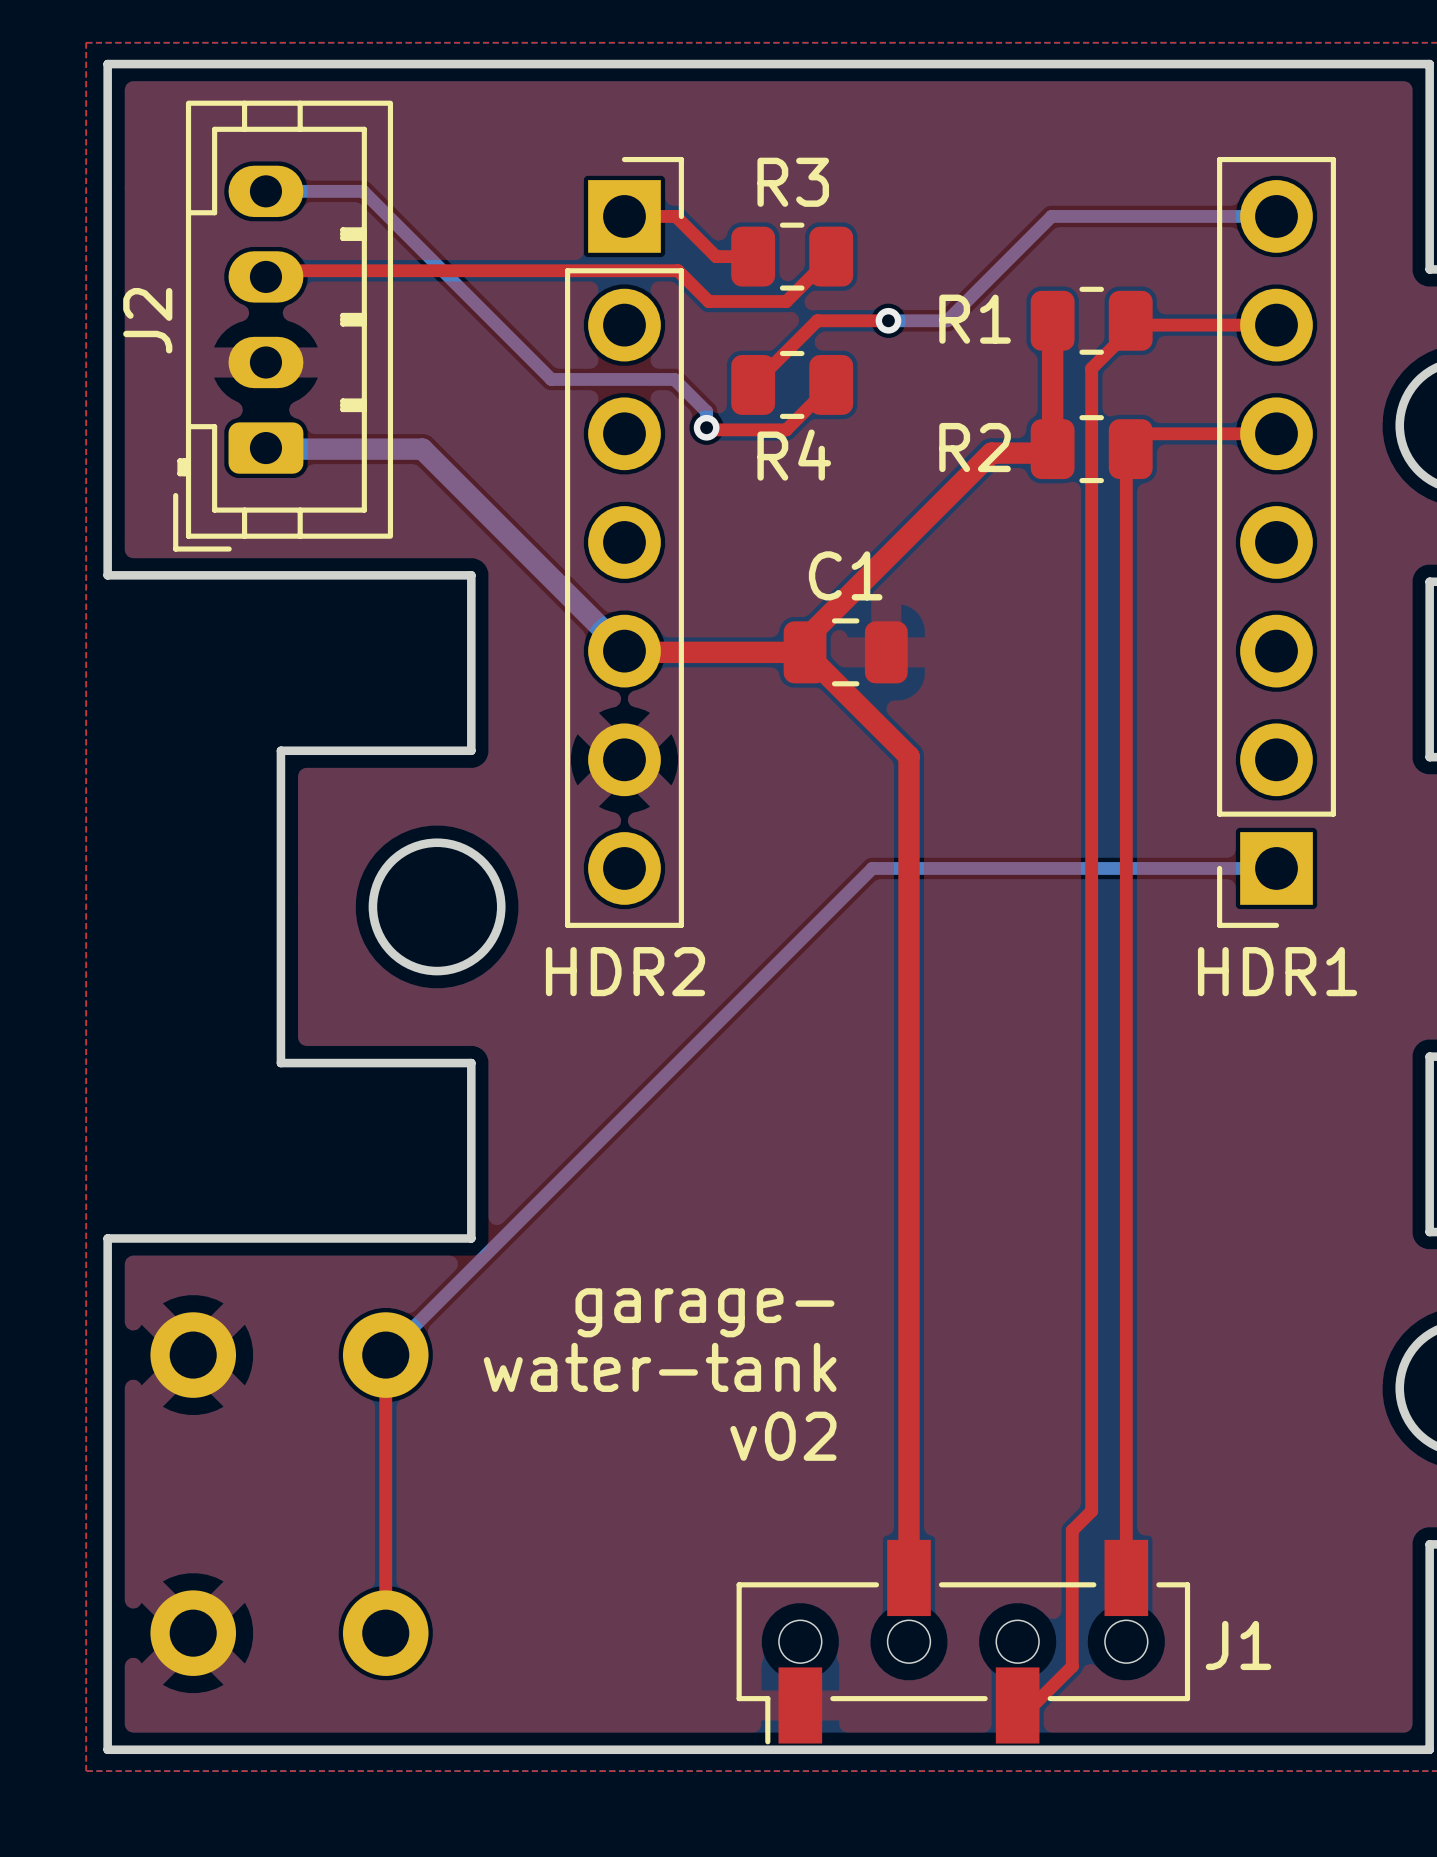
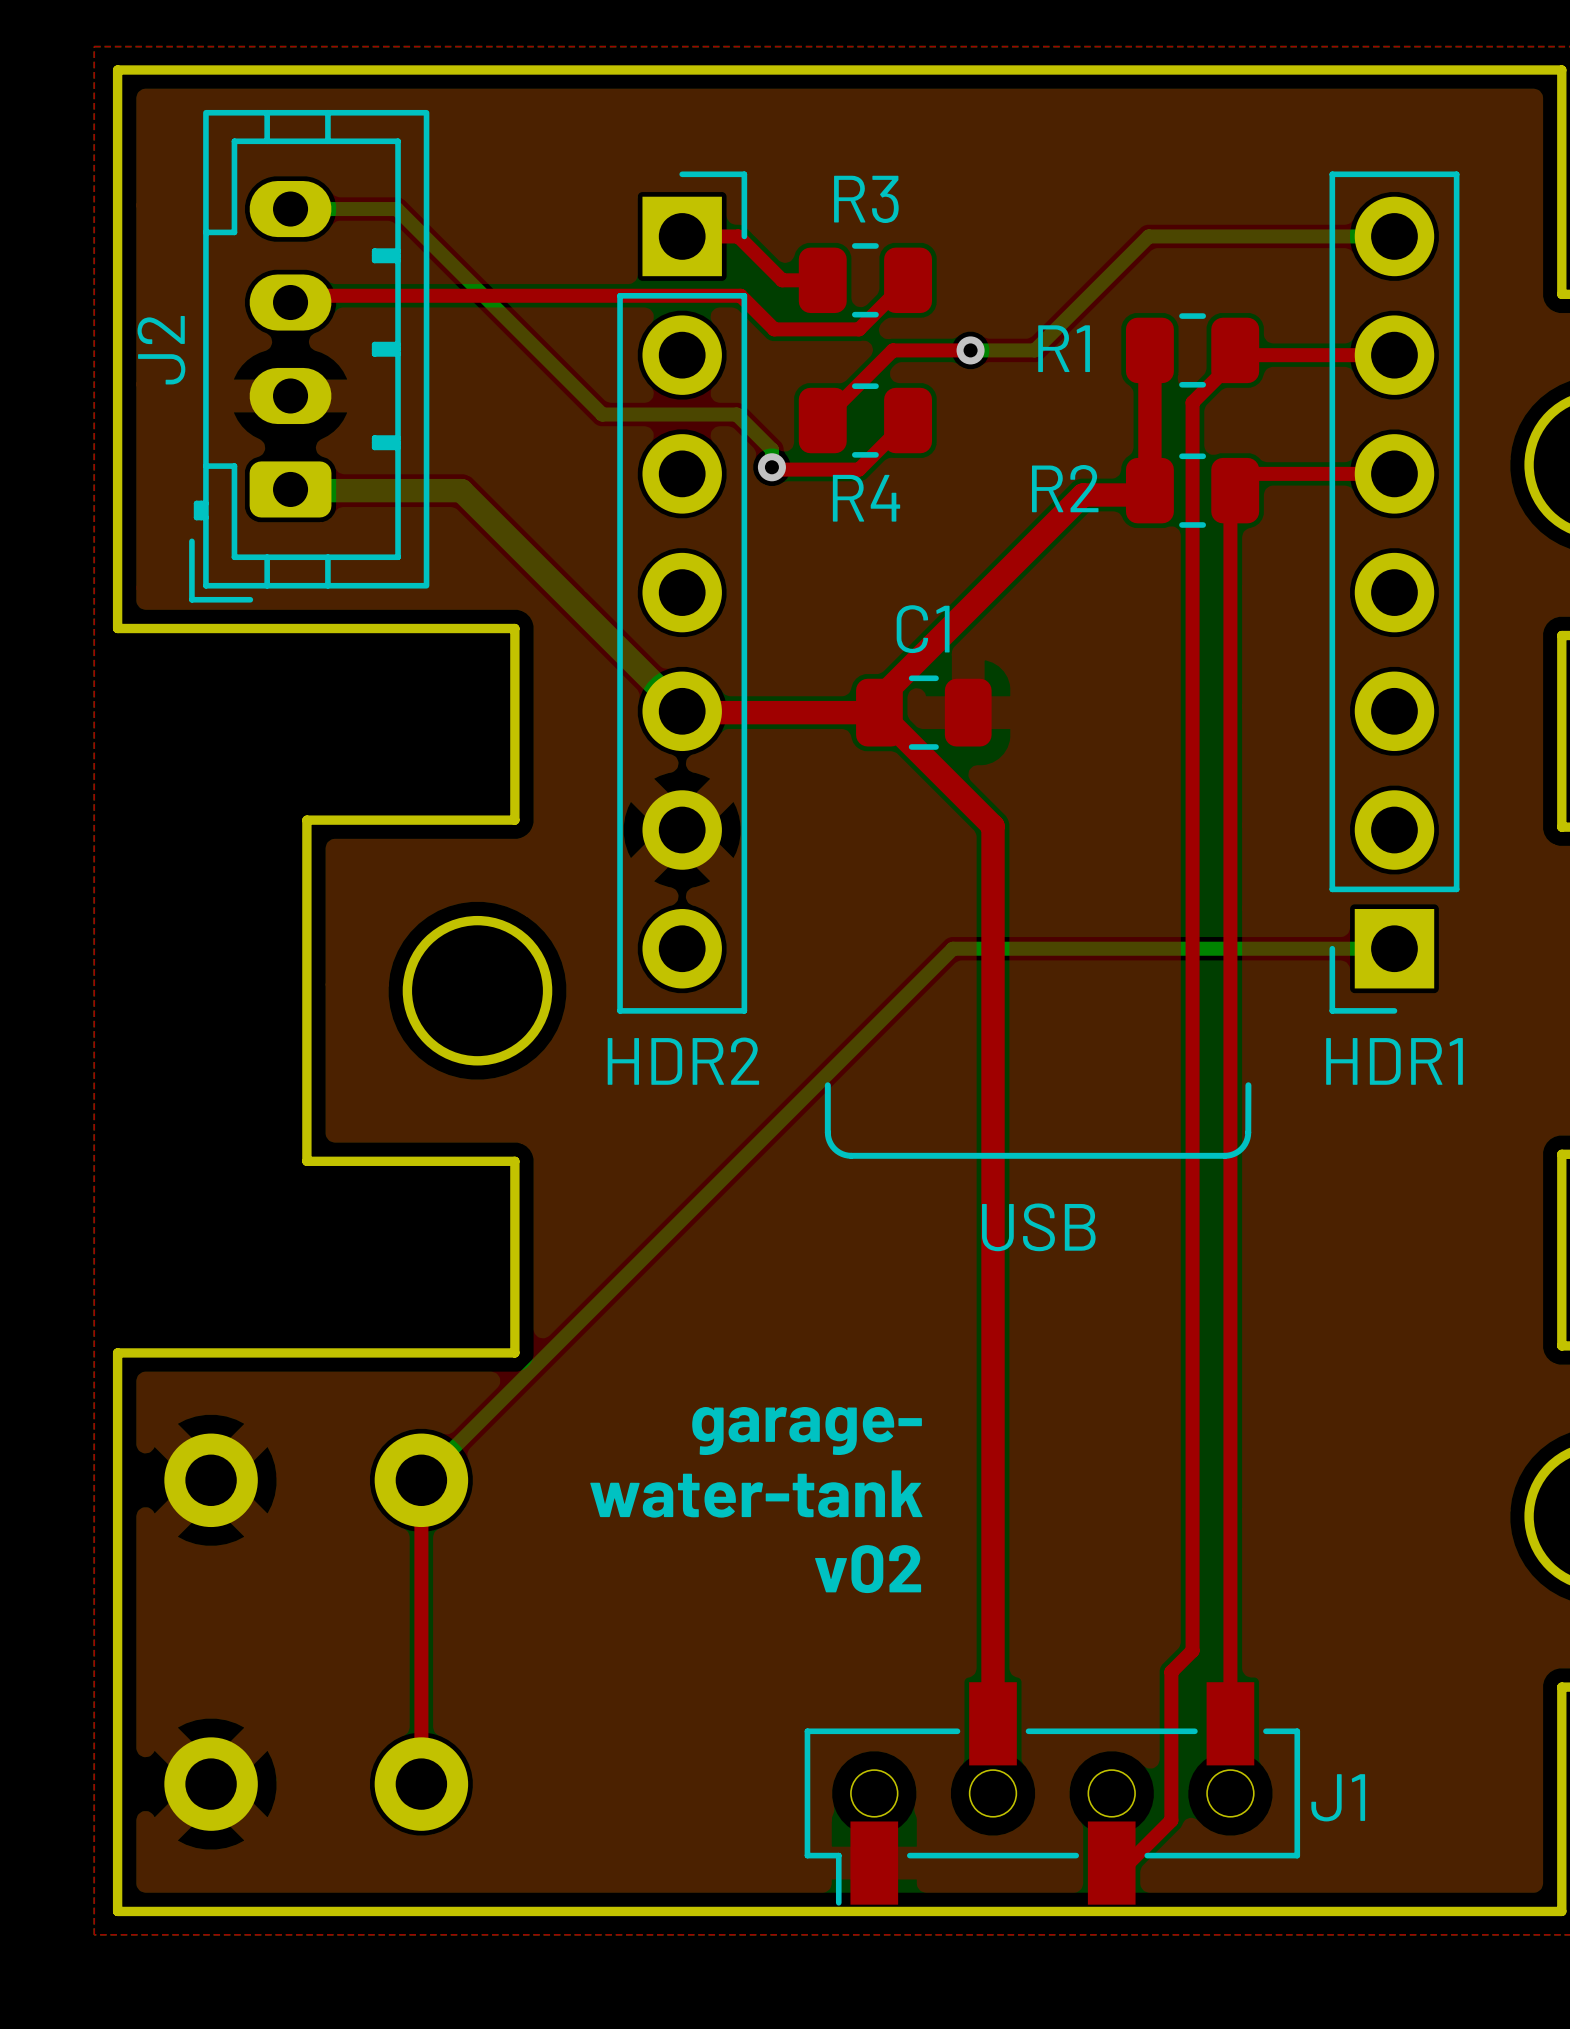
line: none -> (827, 1085) (828, 1138) (836, 1150) (851, 1155) (1227, 1155) (1241, 1148) (1247, 1138) (1248, 1085)
text: none -> USB (1038, 1227)

